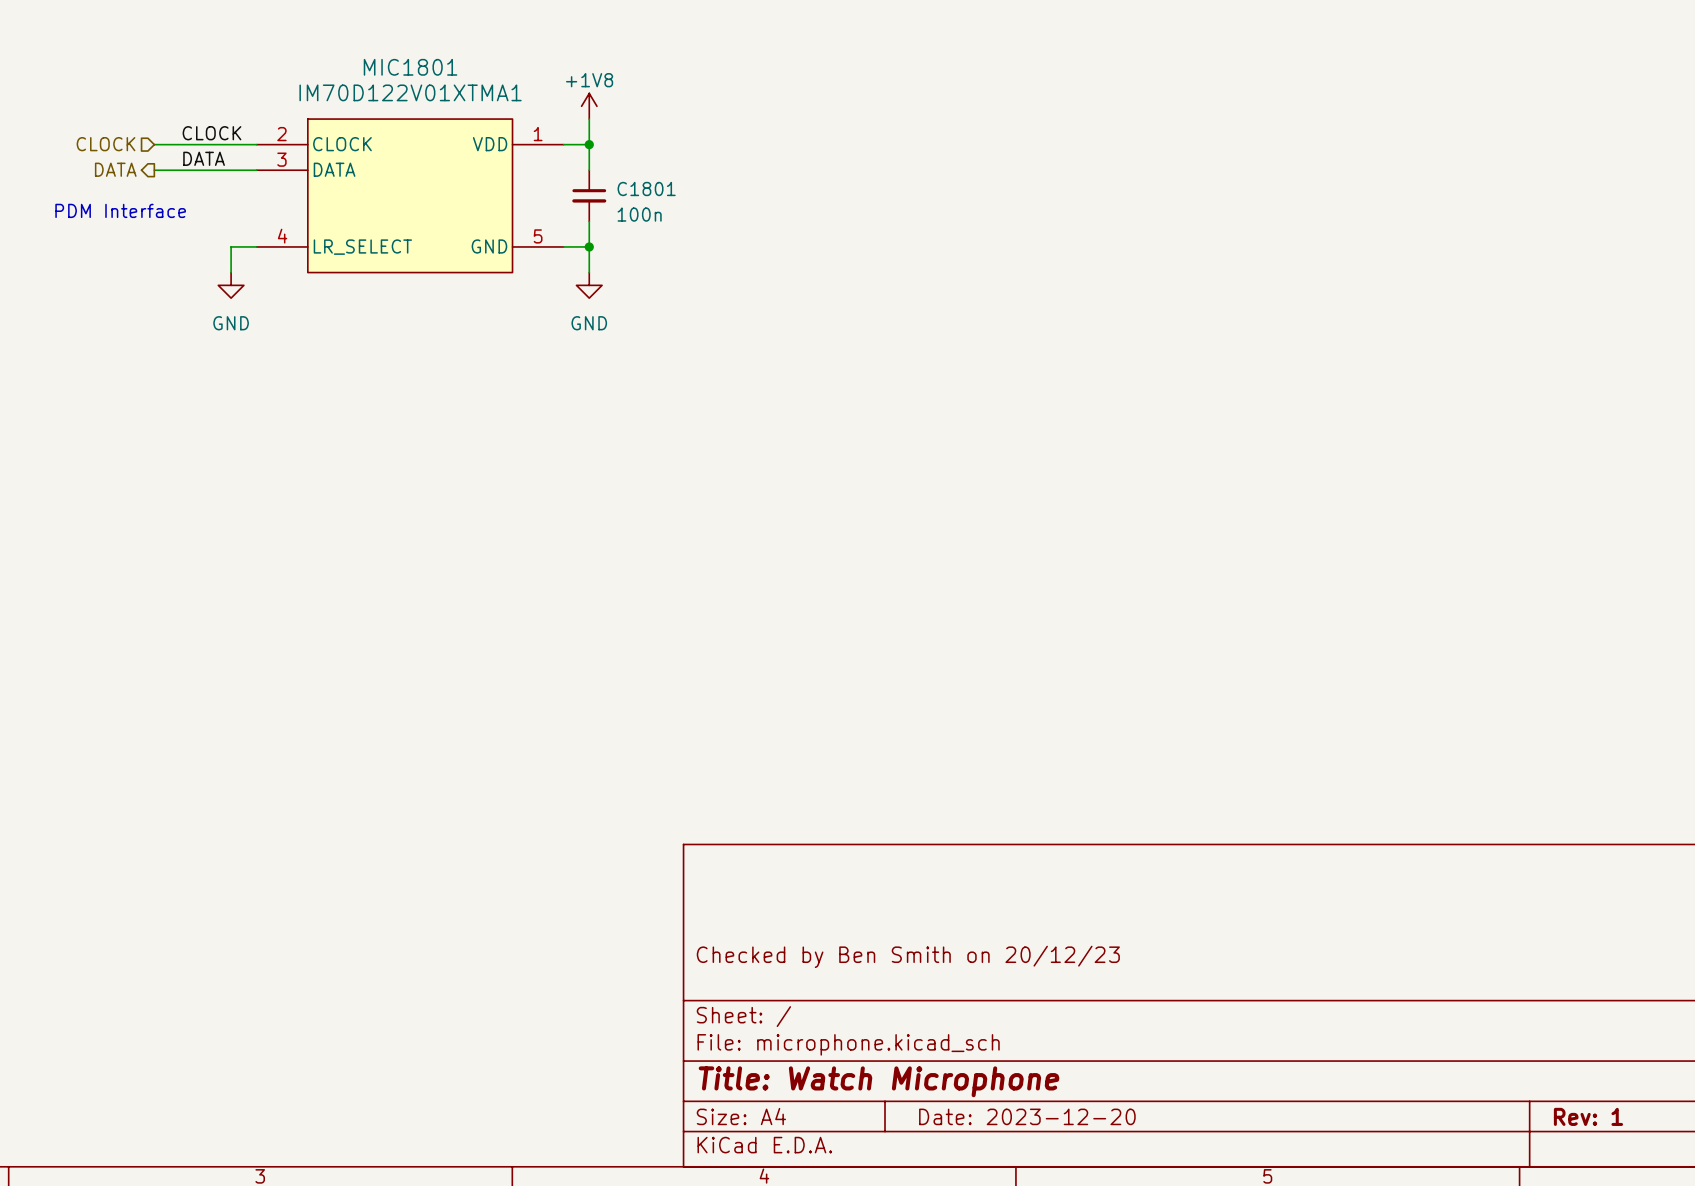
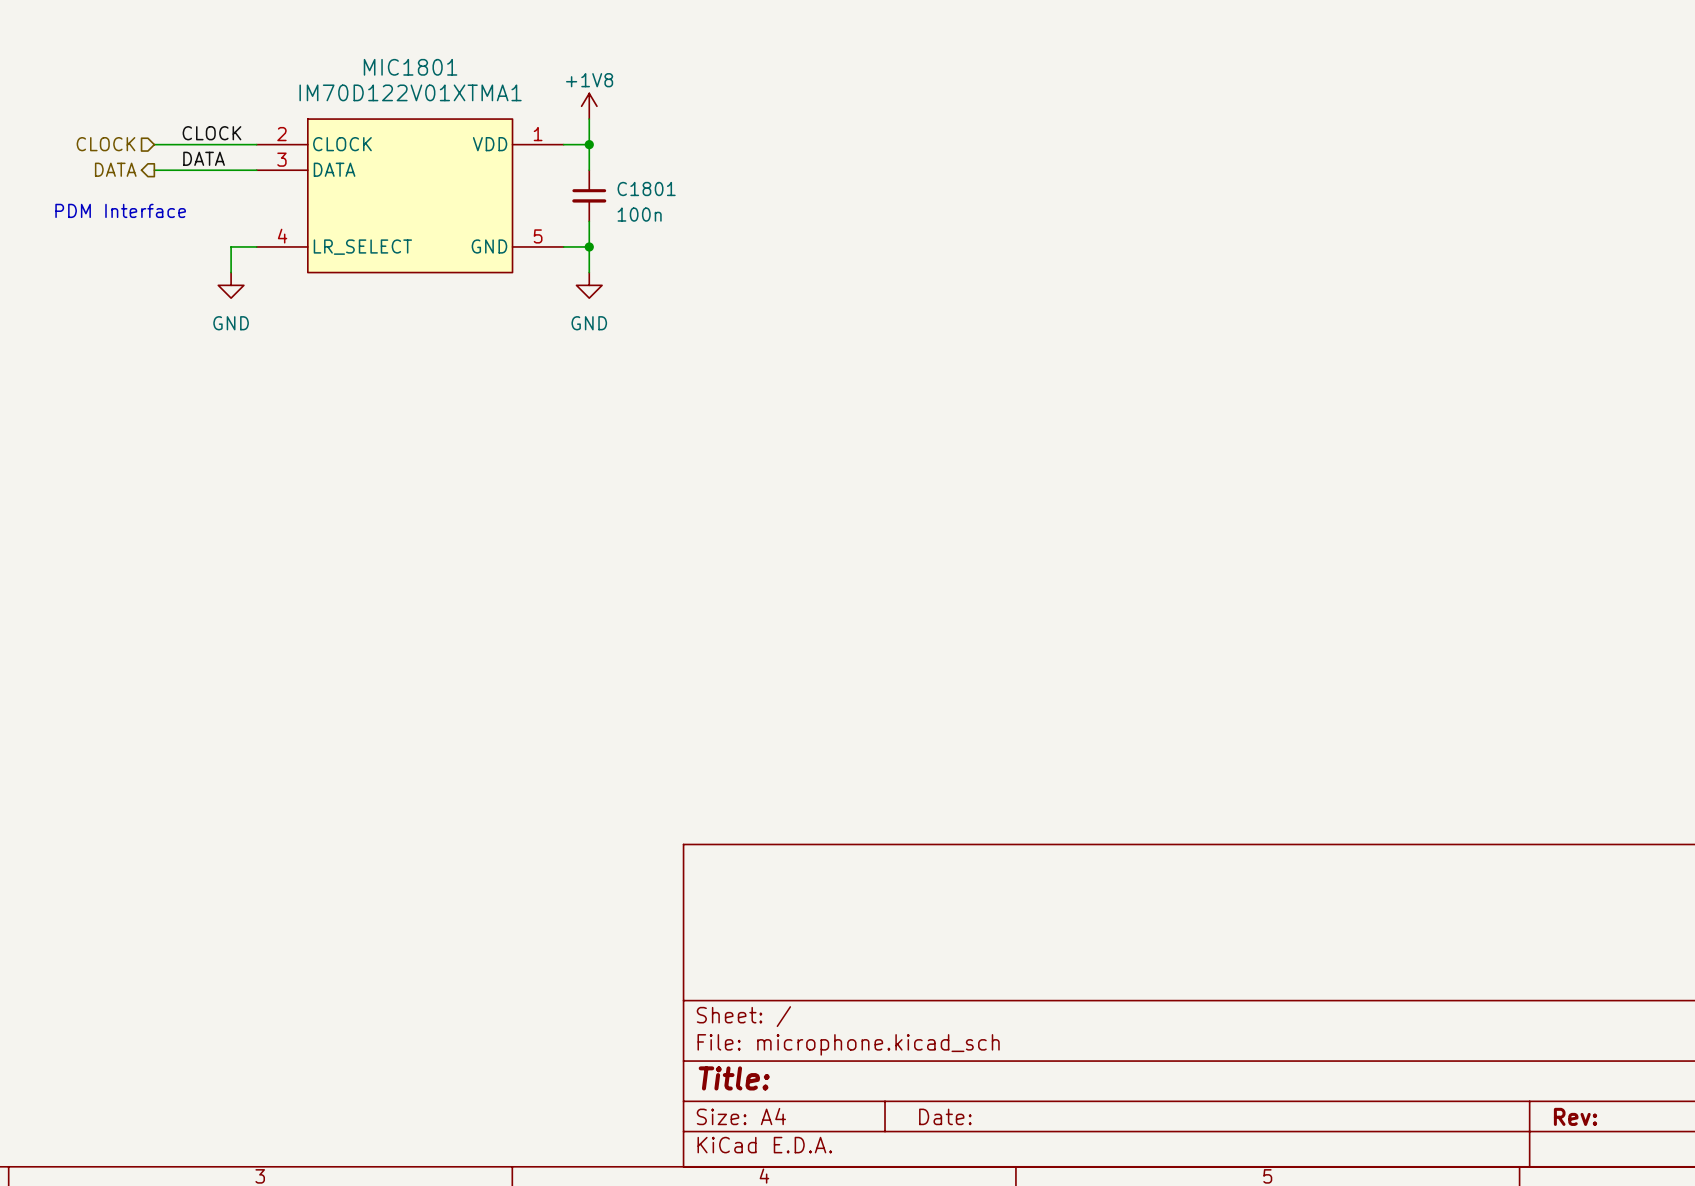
title block: Checked by Ben Smith on 20/12/23 (908, 956) -> none
title block: Title: Watch Microphone (879, 1081) -> Title: (734, 1078)
title block: Date: 2023-12-20 (1027, 1116) -> Date: (945, 1116)
title block: Rev: 1 (1588, 1116) -> Rev: (1575, 1116)

